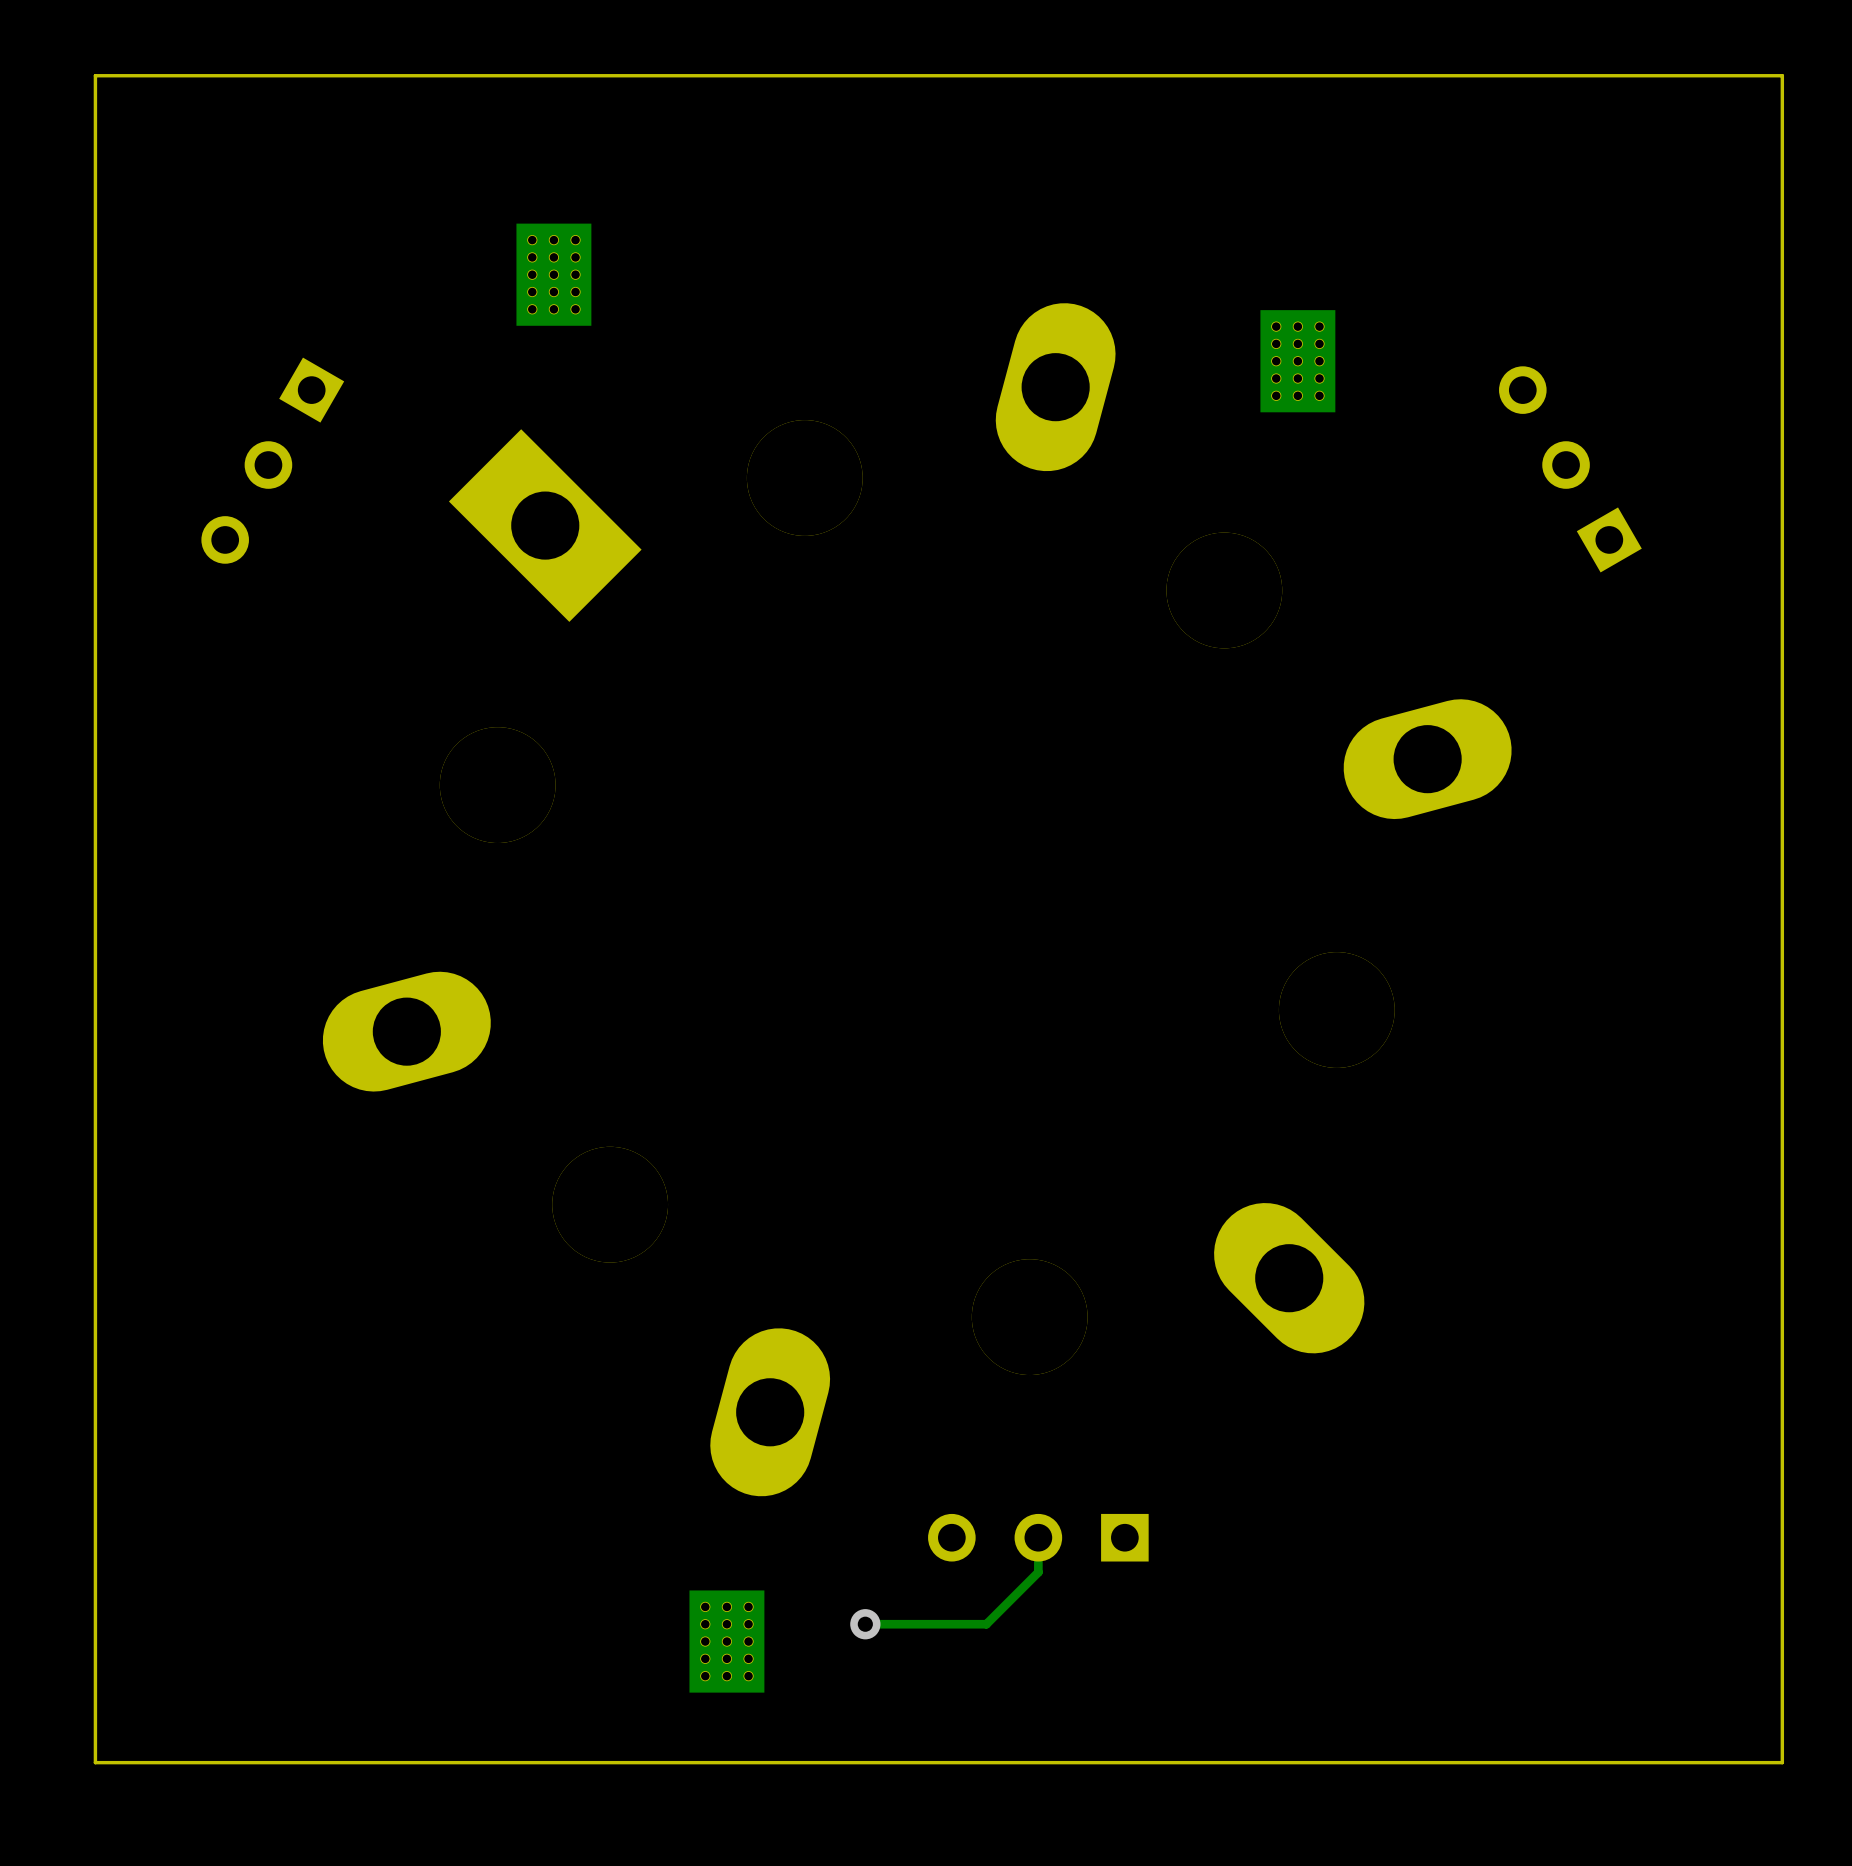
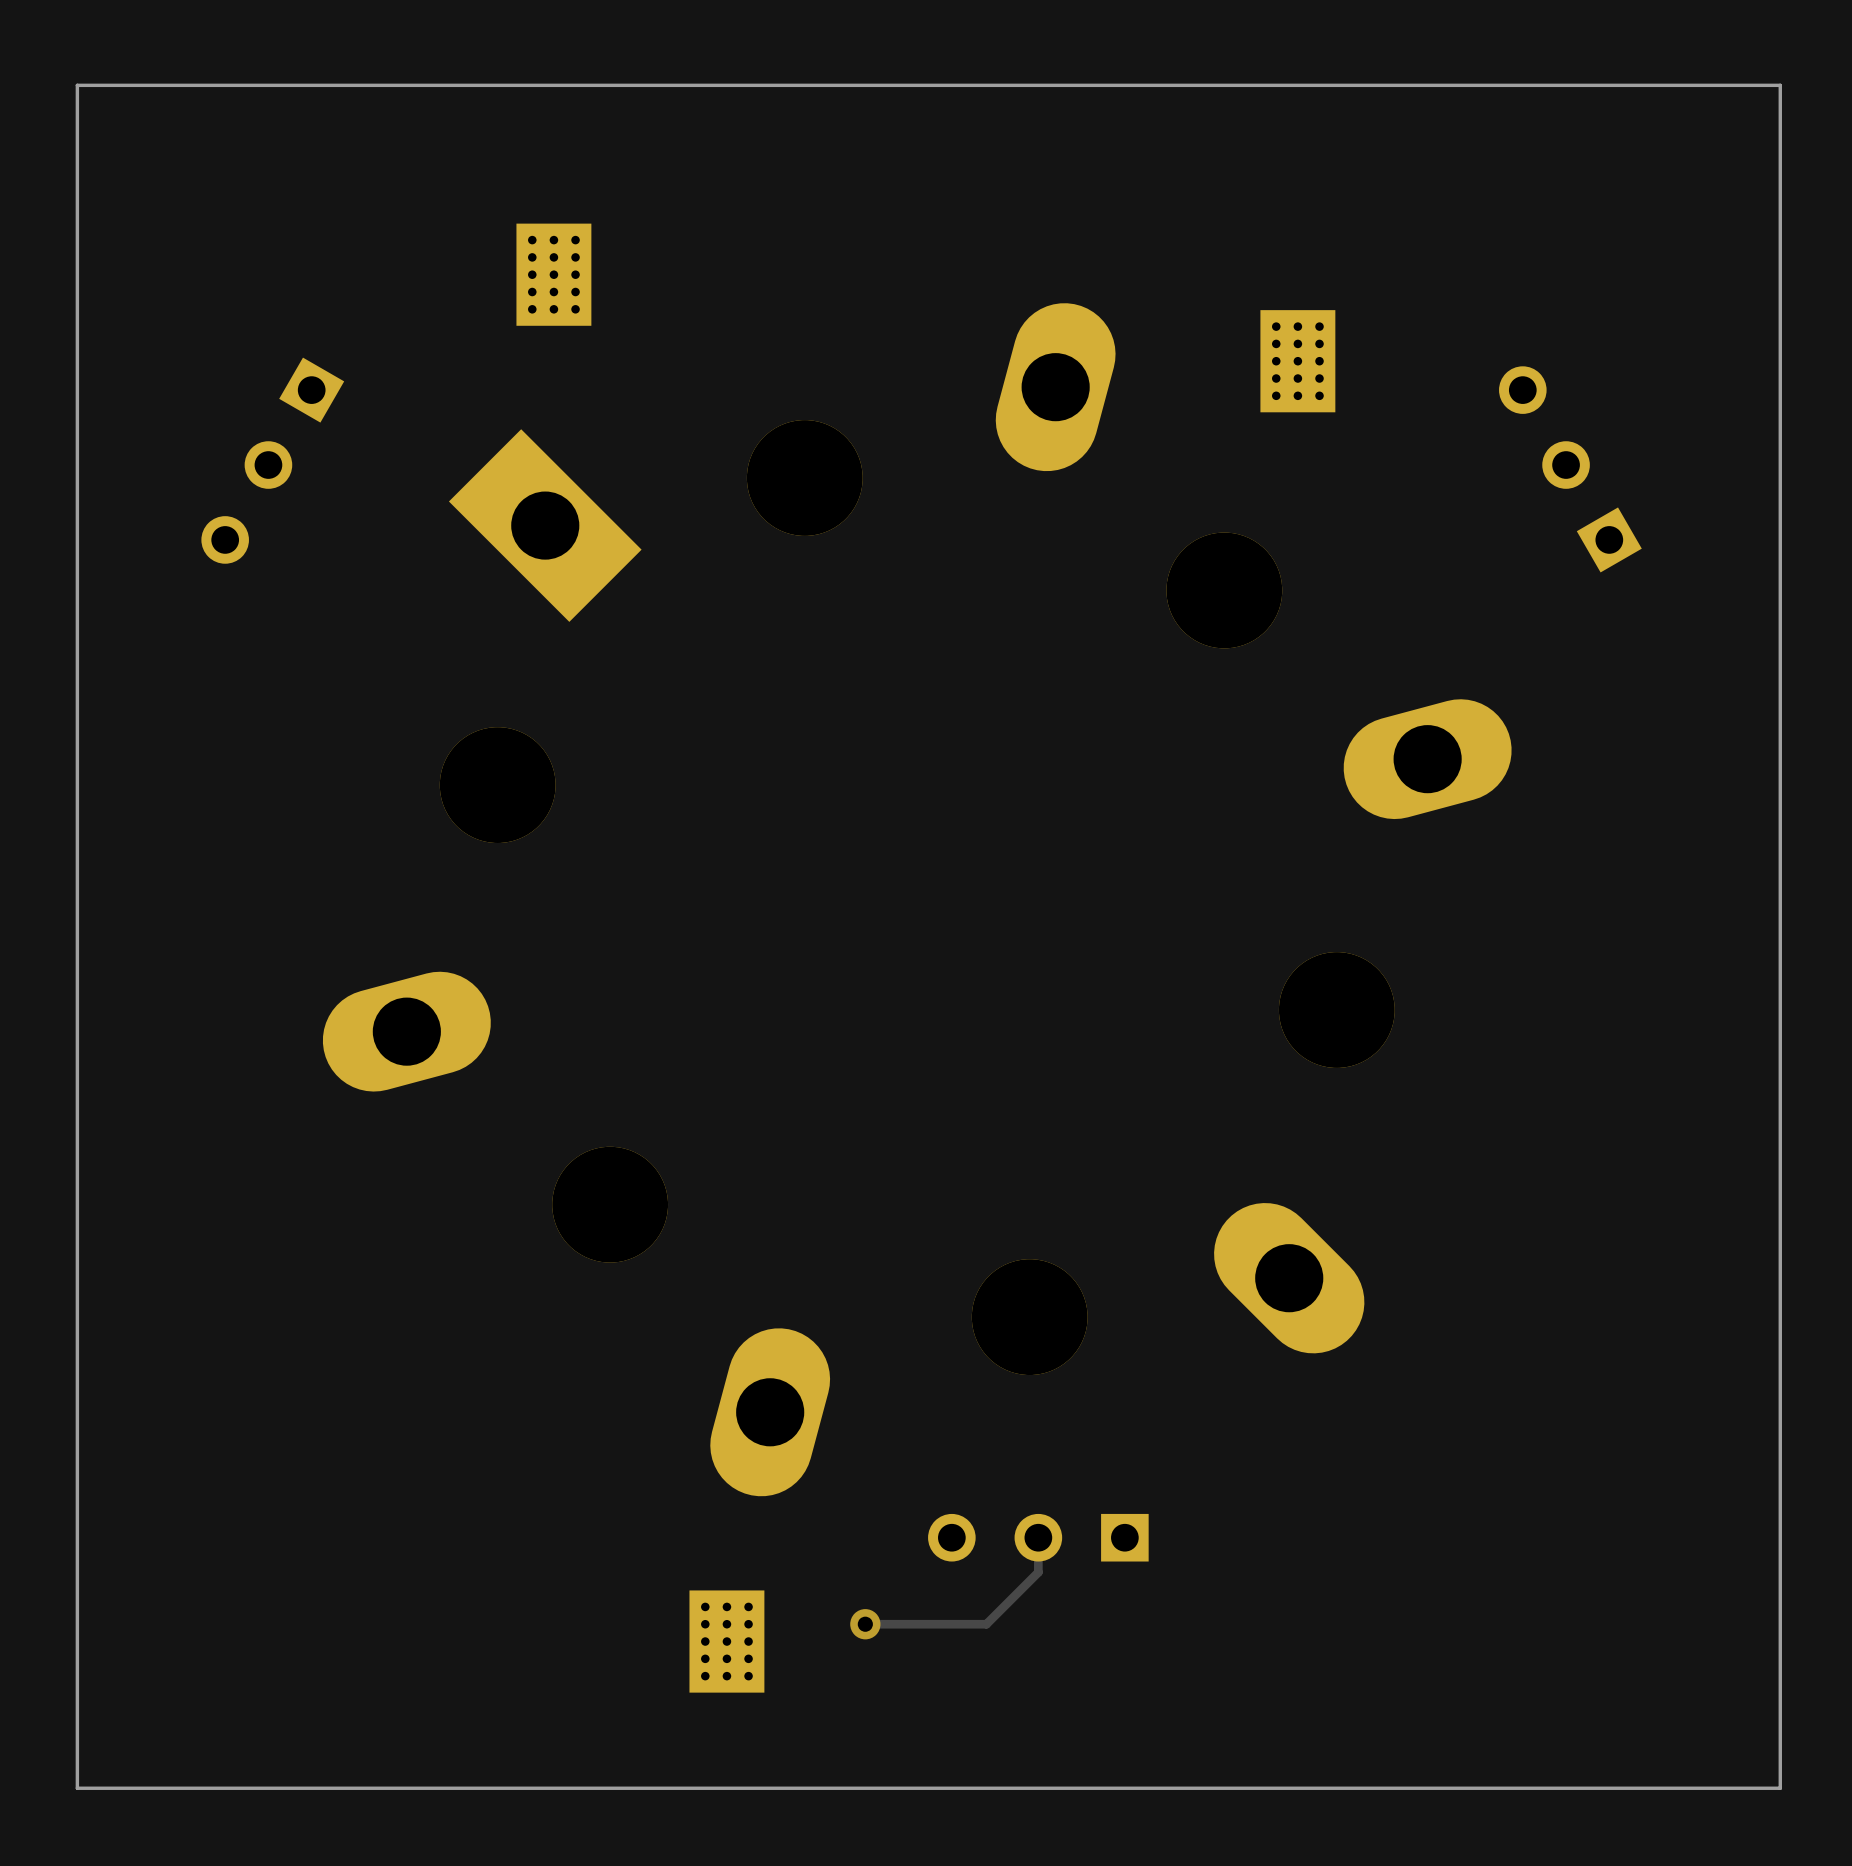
board edge: (1782, 75) (1782, 1762) (95, 1762) (95, 75) (1782, 75) -> (1780, 85) (1780, 1788) (77, 1788) (77, 85) (1780, 85)

